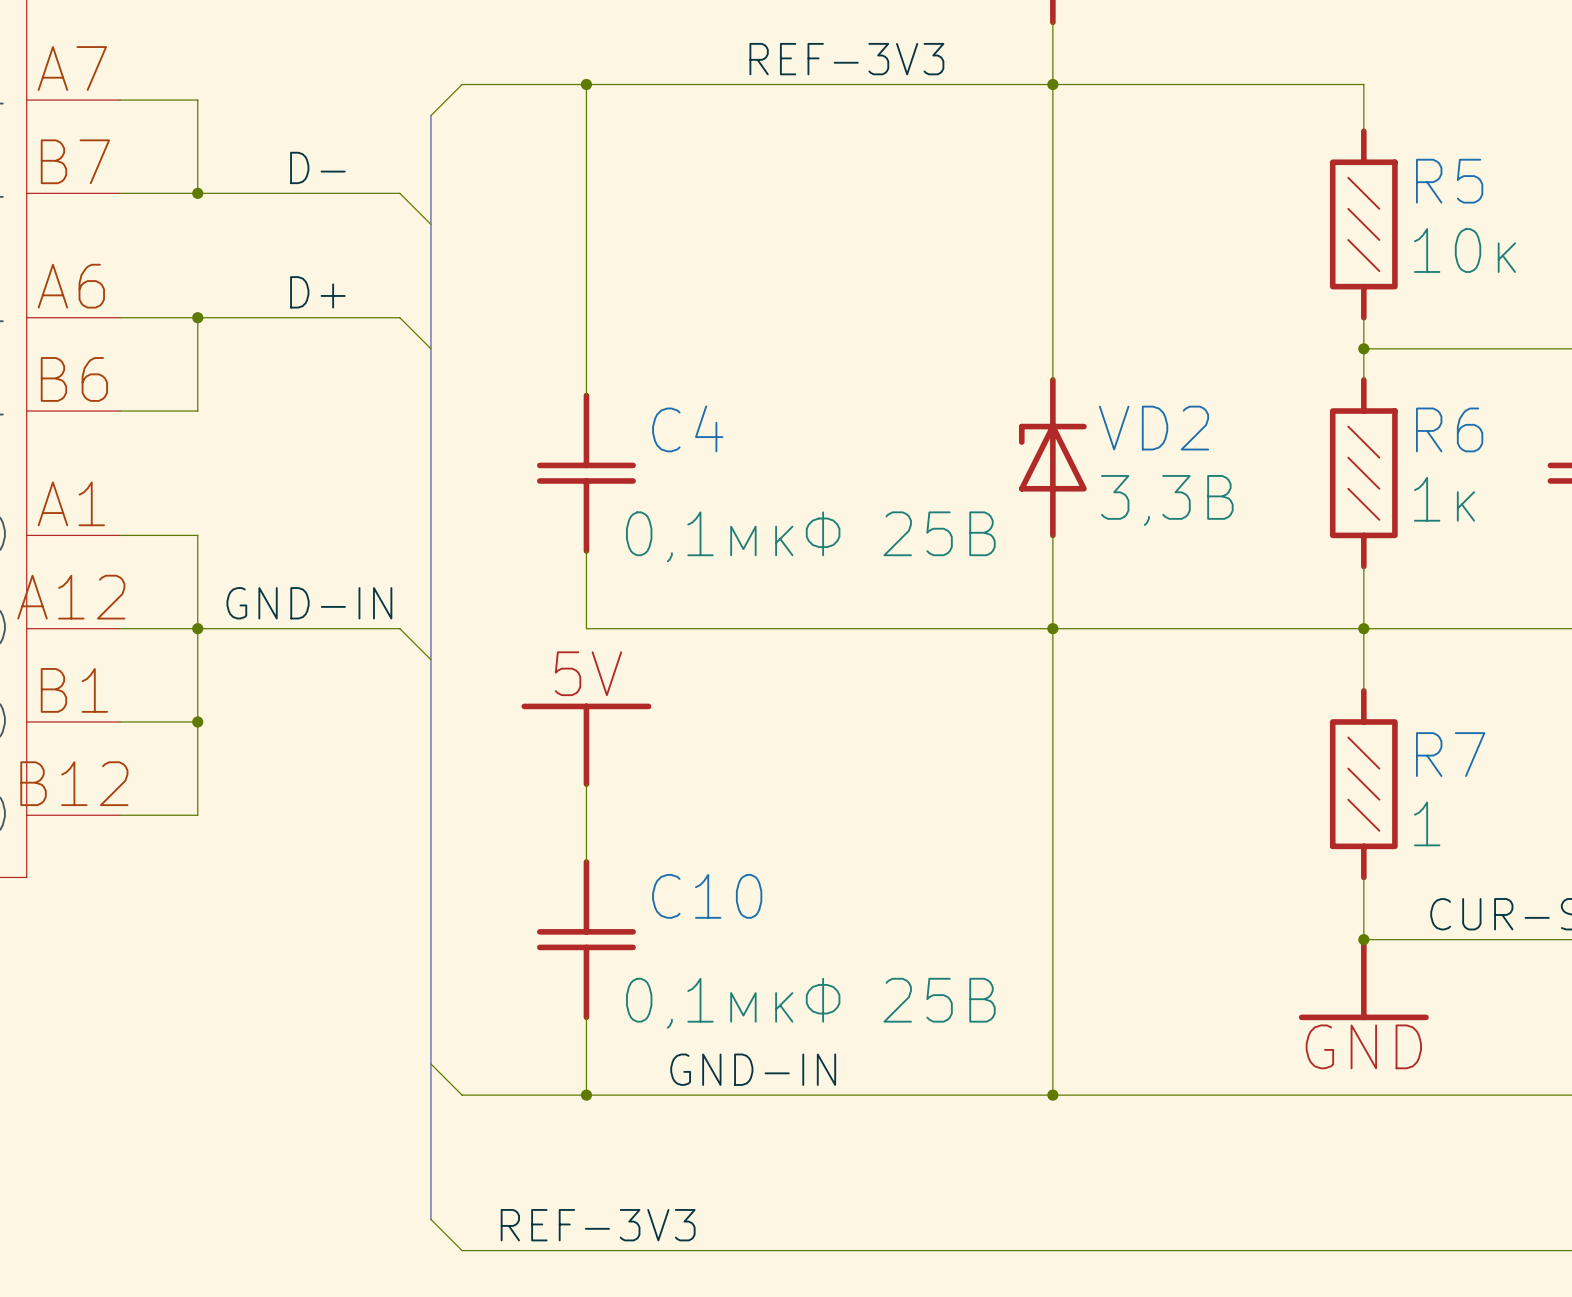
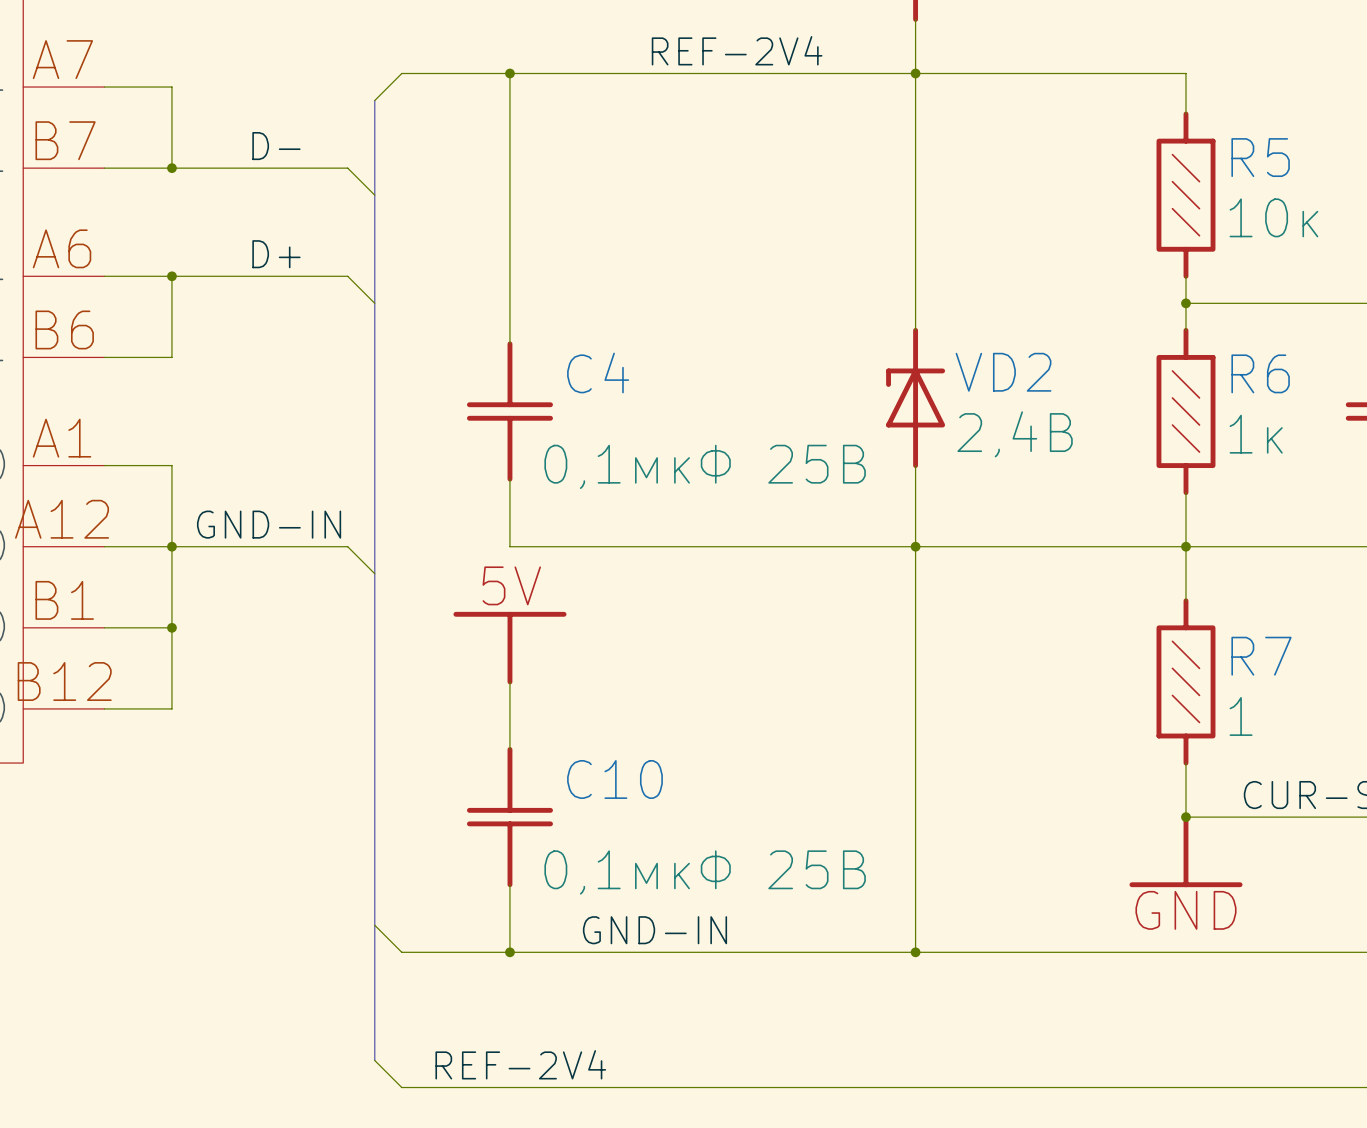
label: REF-3V3 (846, 59) -> REF-2V4 (737, 50)
VD2 text: 3,3В (1167, 500) -> 2,4В (1015, 434)
label: REF-3V3 (598, 1225) -> REF-2V4 (520, 1064)

